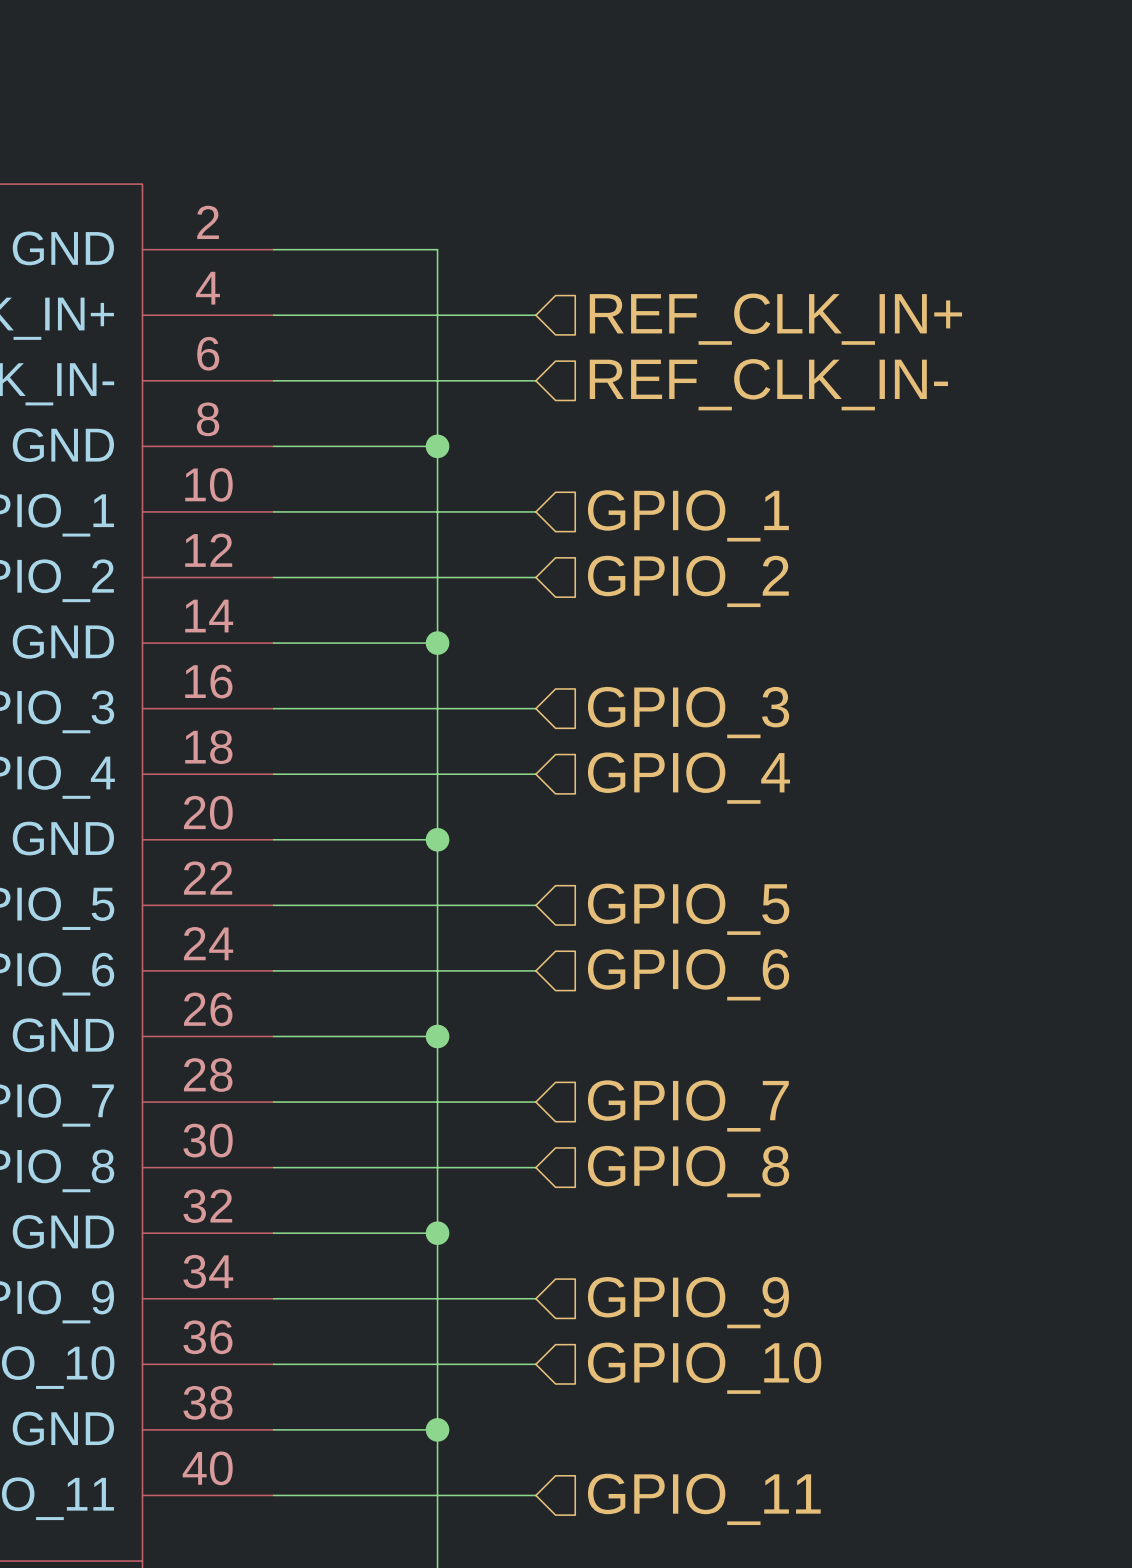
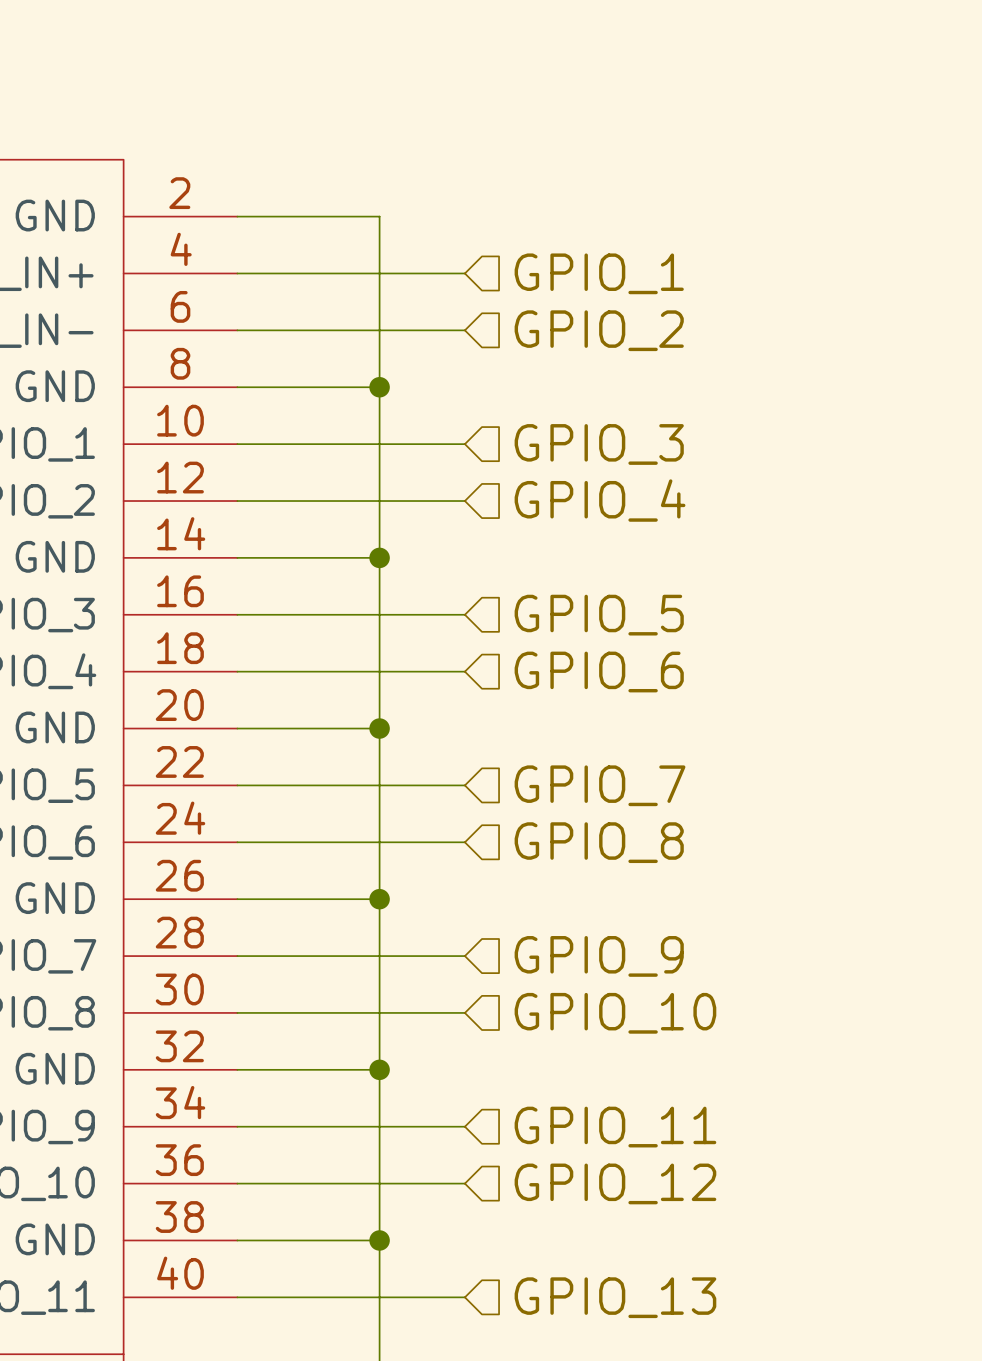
hierarchical label: REF_CLK_IN+ (775, 319) -> GPIO_1 (599, 273)
hierarchical label: REF_CLK_IN- (768, 384) -> GPIO_2 (599, 330)
hierarchical label: GPIO_1 (688, 515) -> GPIO_3 (599, 444)
hierarchical label: GPIO_2 (688, 581) -> GPIO_4 (600, 500)
hierarchical label: GPIO_3 (688, 712) -> GPIO_5 (599, 615)
hierarchical label: GPIO_4 (688, 778) -> GPIO_6 (599, 672)
hierarchical label: GPIO_5 (688, 909) -> GPIO_7 (600, 785)
hierarchical label: GPIO_6 (688, 974) -> GPIO_8 (599, 842)
hierarchical label: GPIO_7 (688, 1105) -> GPIO_9 (599, 956)
hierarchical label: GPIO_8 (688, 1171) -> GPIO_10 (615, 1013)
hierarchical label: GPIO_9 (688, 1302) -> GPIO_11 (615, 1127)
hierarchical label: GPIO_10 (704, 1368) -> GPIO_12 (615, 1183)
hierarchical label: GPIO_11 (704, 1499) -> GPIO_13 (615, 1297)

